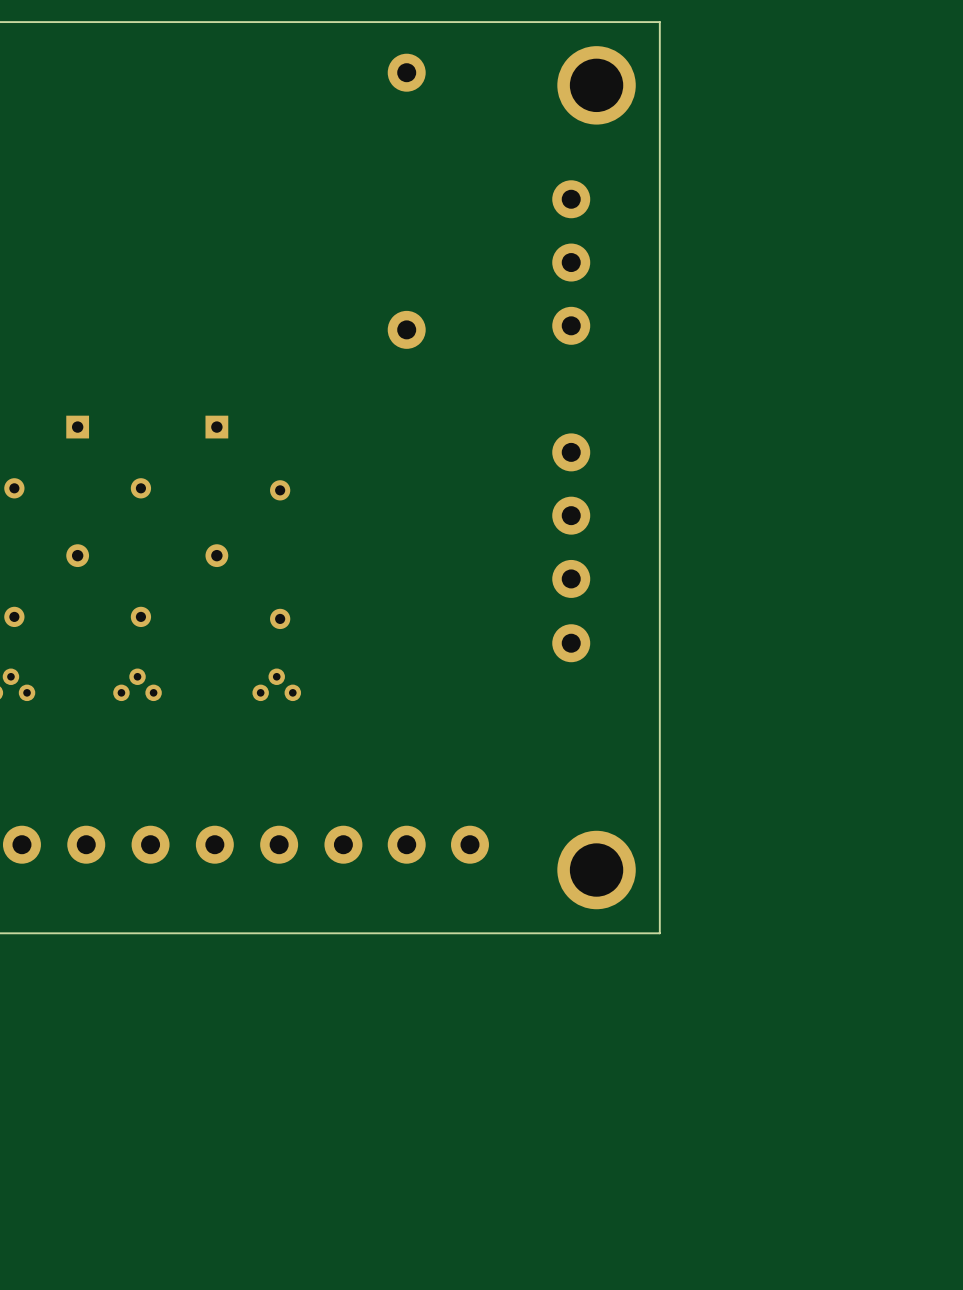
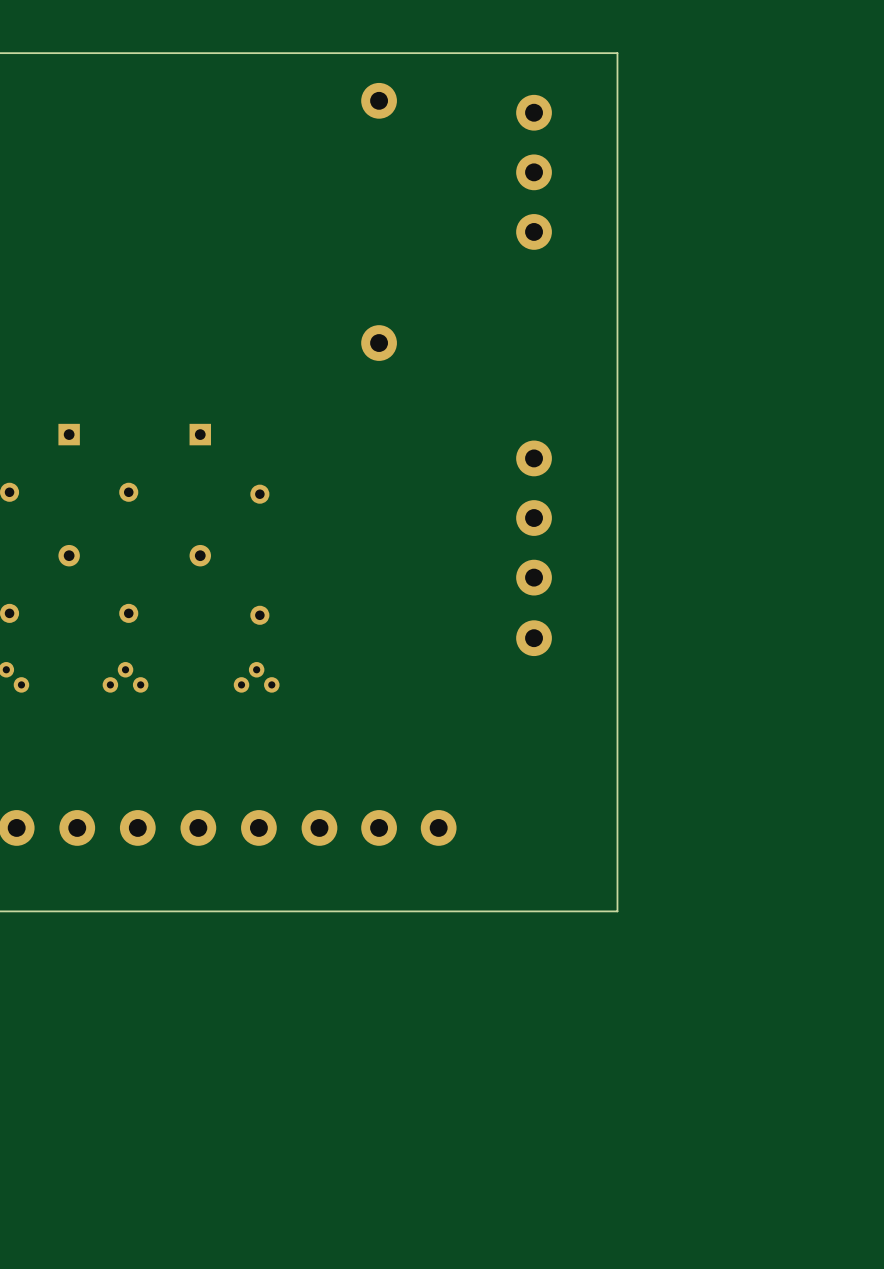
part: (596, 85) -> none
part position: (571, 262) -> (534, 172)
part: (596, 870) -> none

